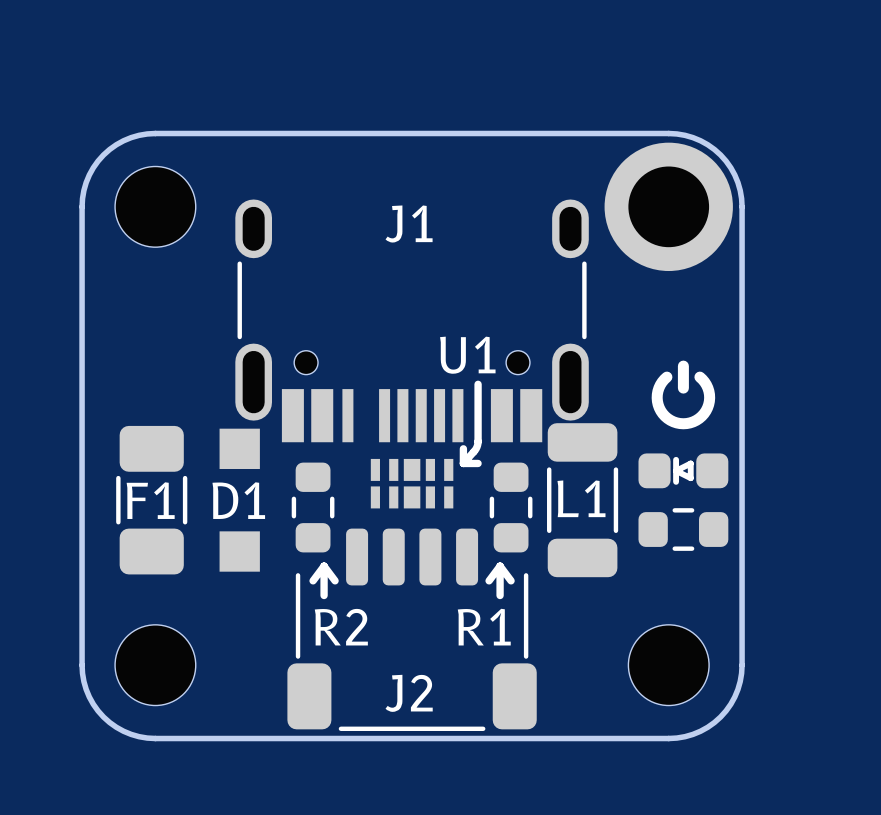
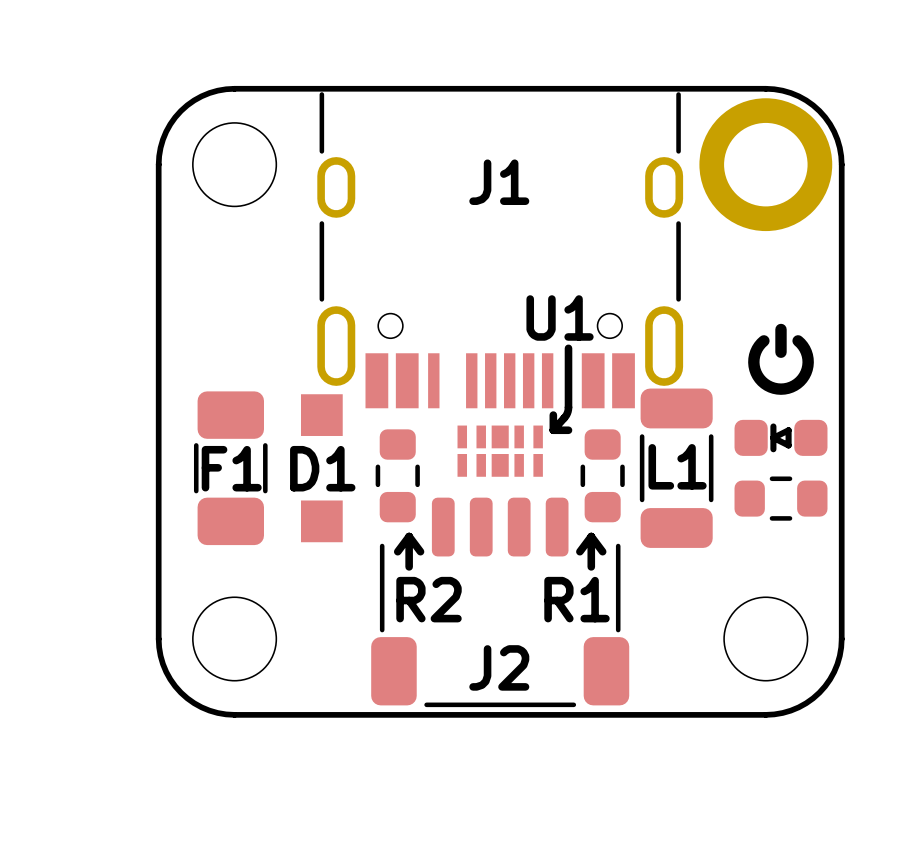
J1 footprint: [235, 199, 589, 443] -> [317, 92, 684, 409]

